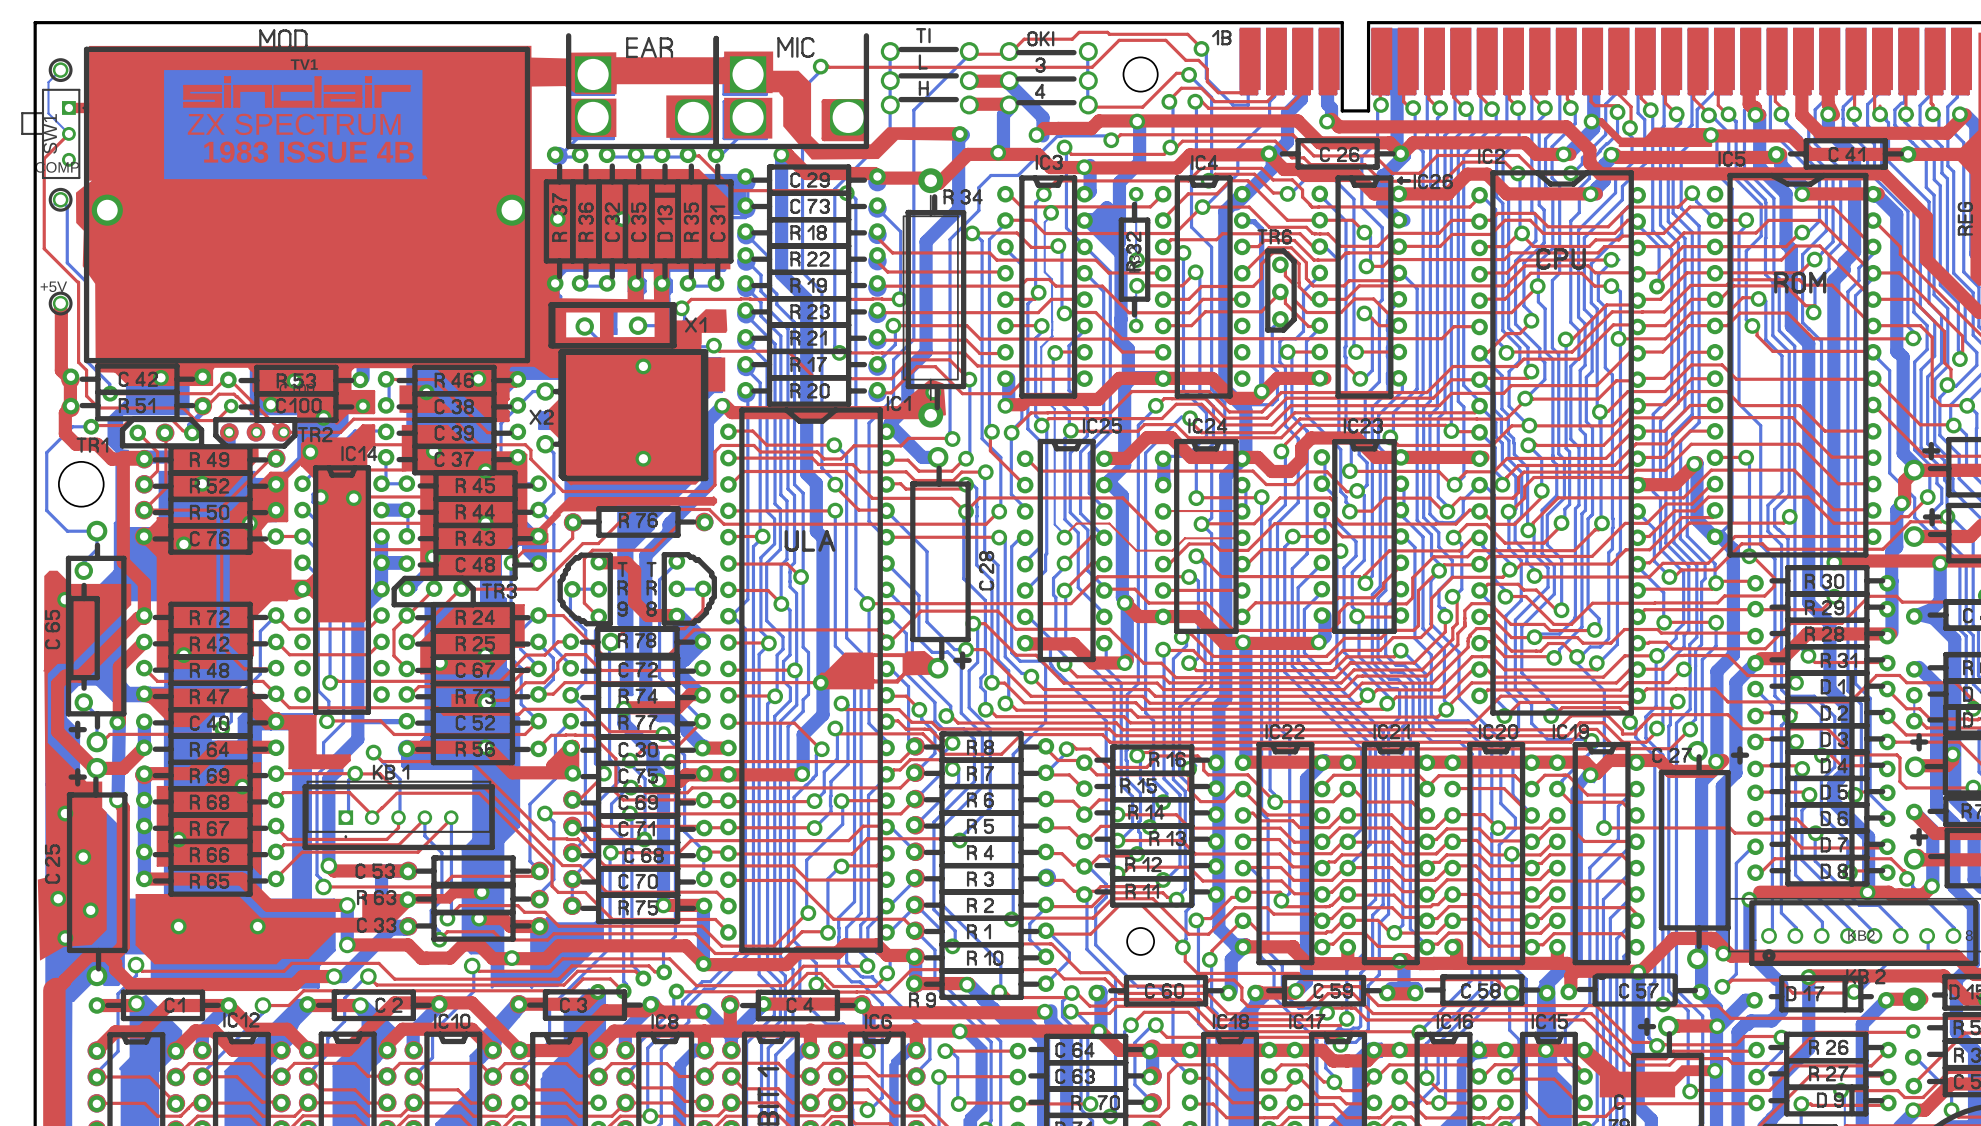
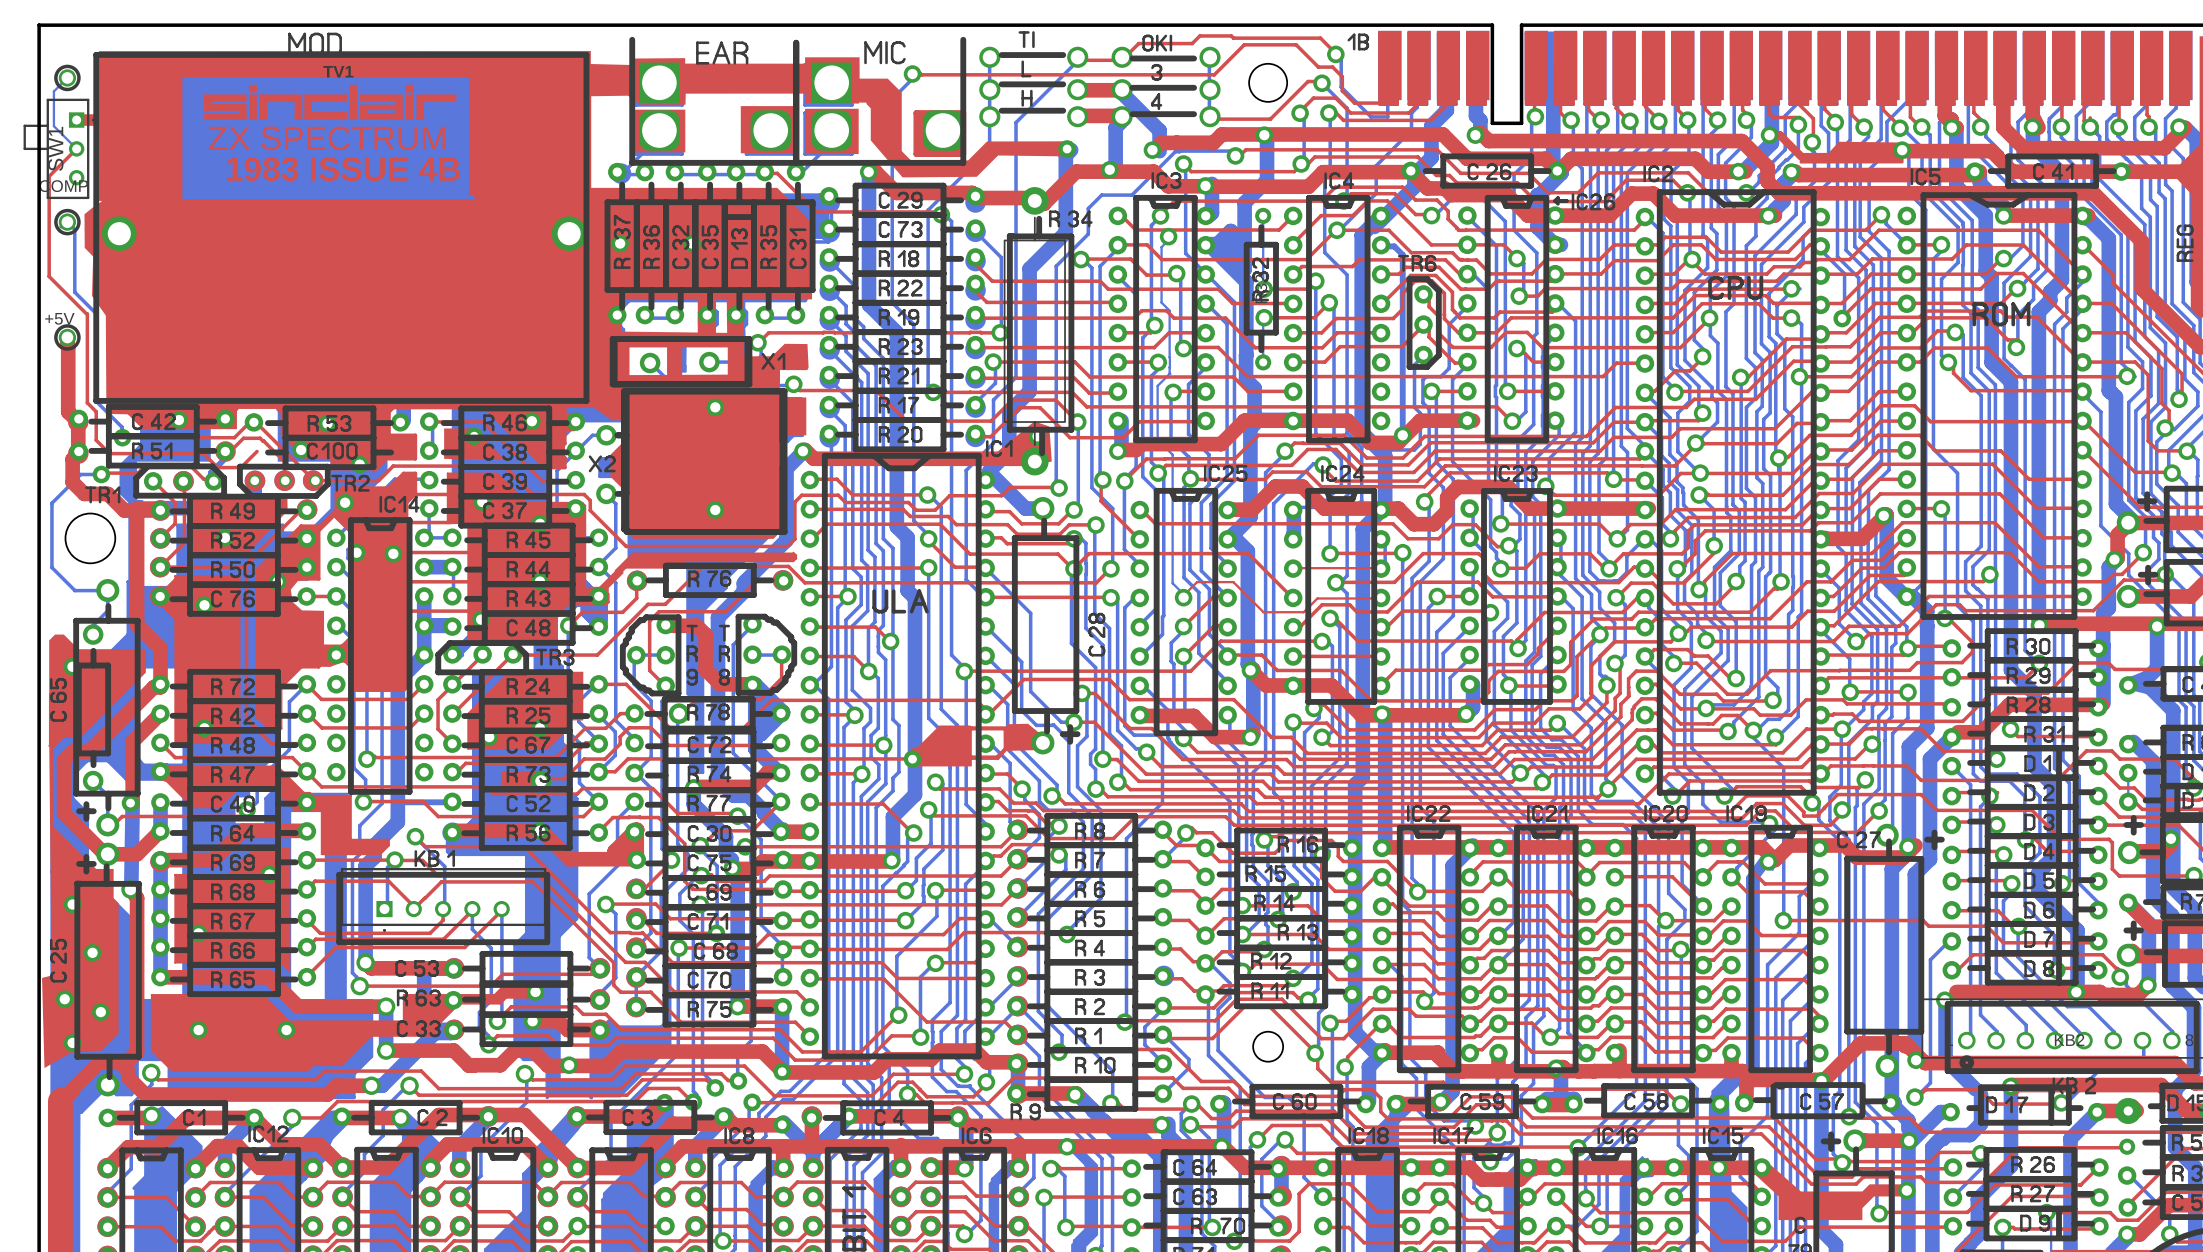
part: (297, 406) -> none

